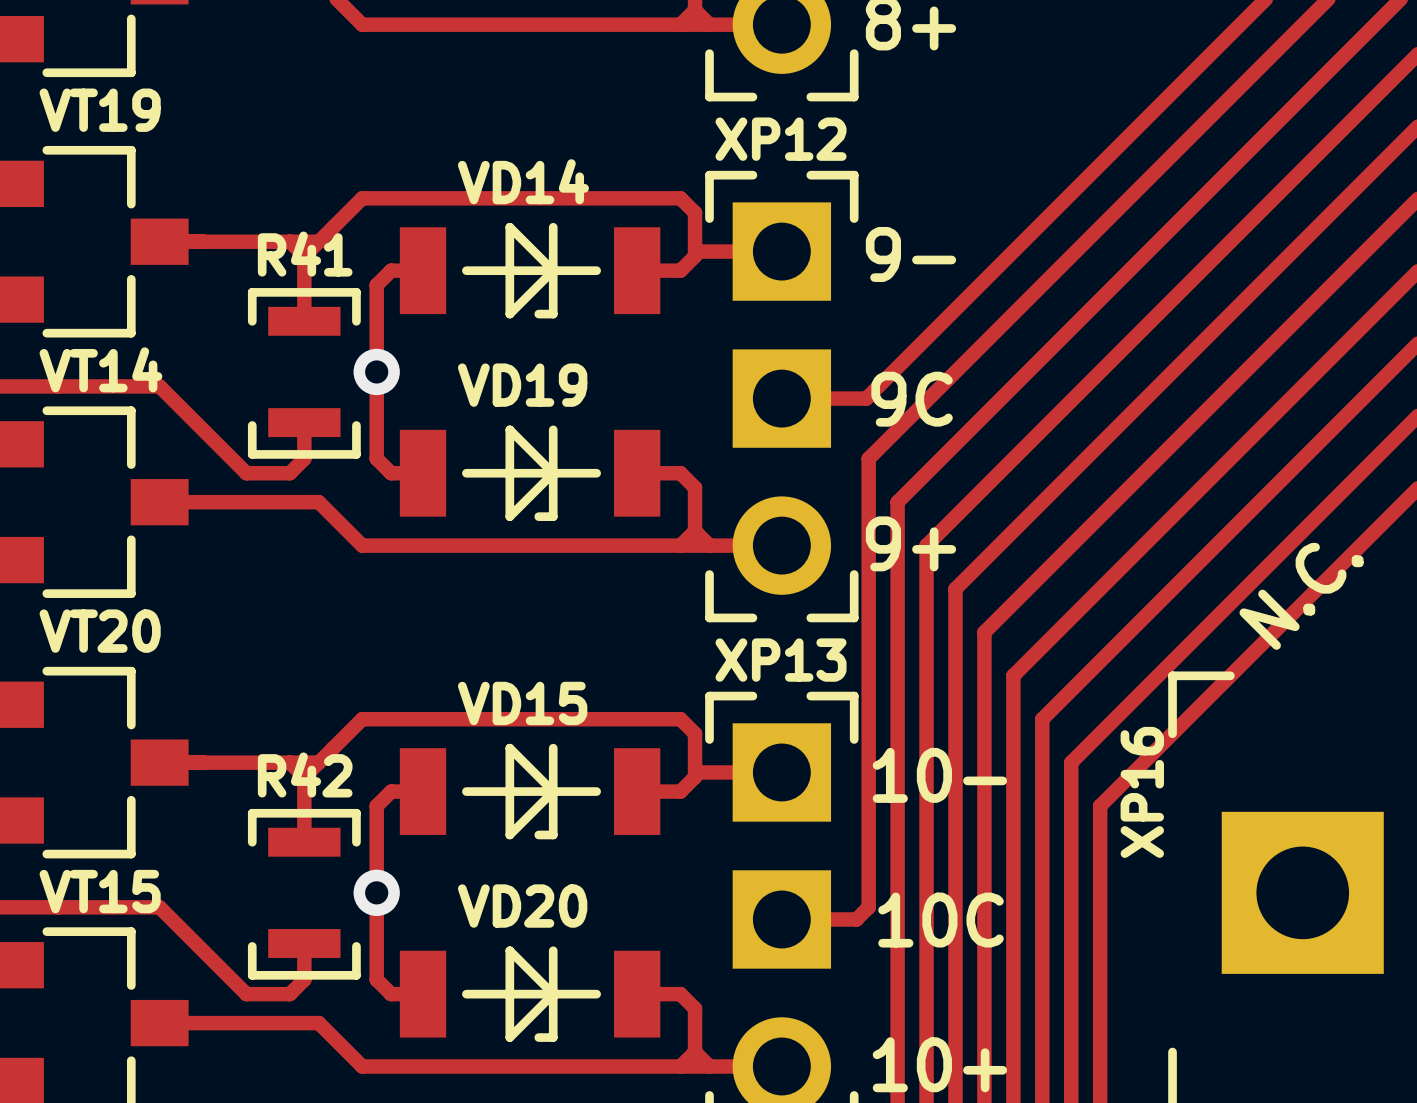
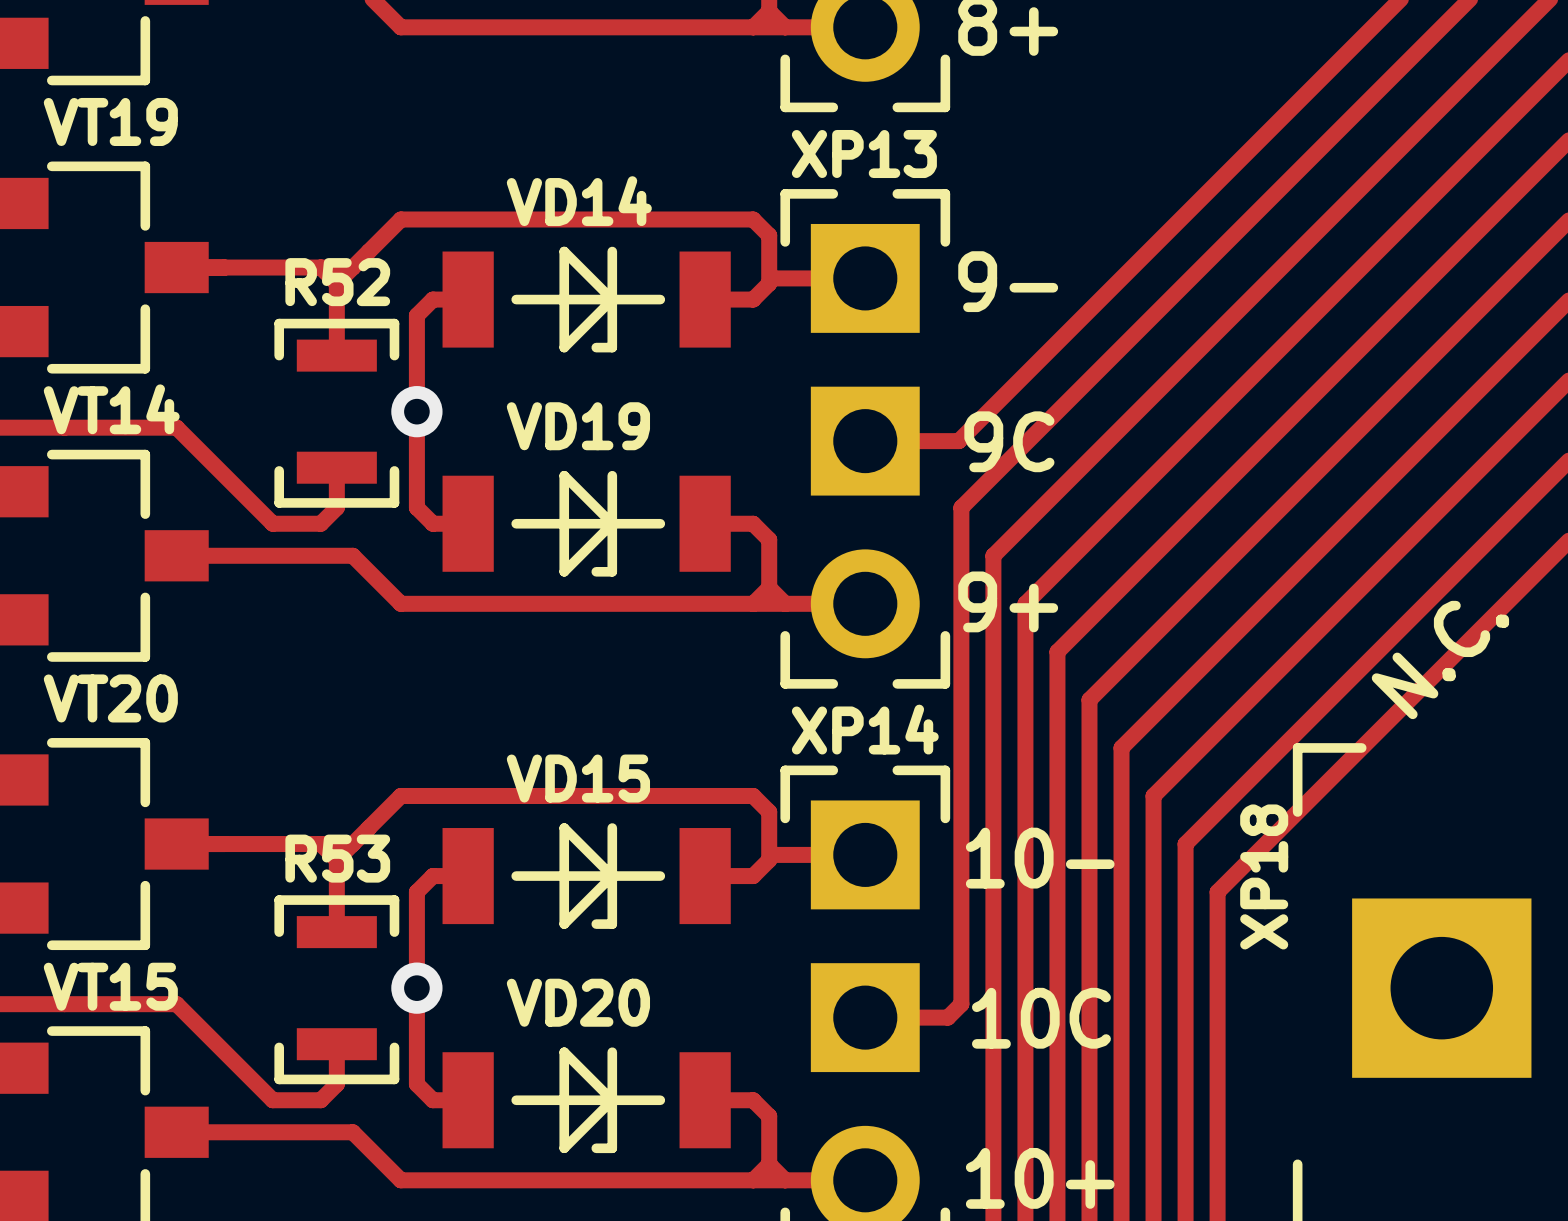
XP12 name: XP12 (781, 139) -> XP13 (864, 154)
R41 name: R41 (305, 254) -> R52 (337, 282)
XP13 name: XP13 (781, 660) -> XP14 (865, 729)
R42 name: R42 (305, 774) -> R53 (337, 858)
XP16 name: XP16 (1142, 792) -> XP18 (1264, 876)

